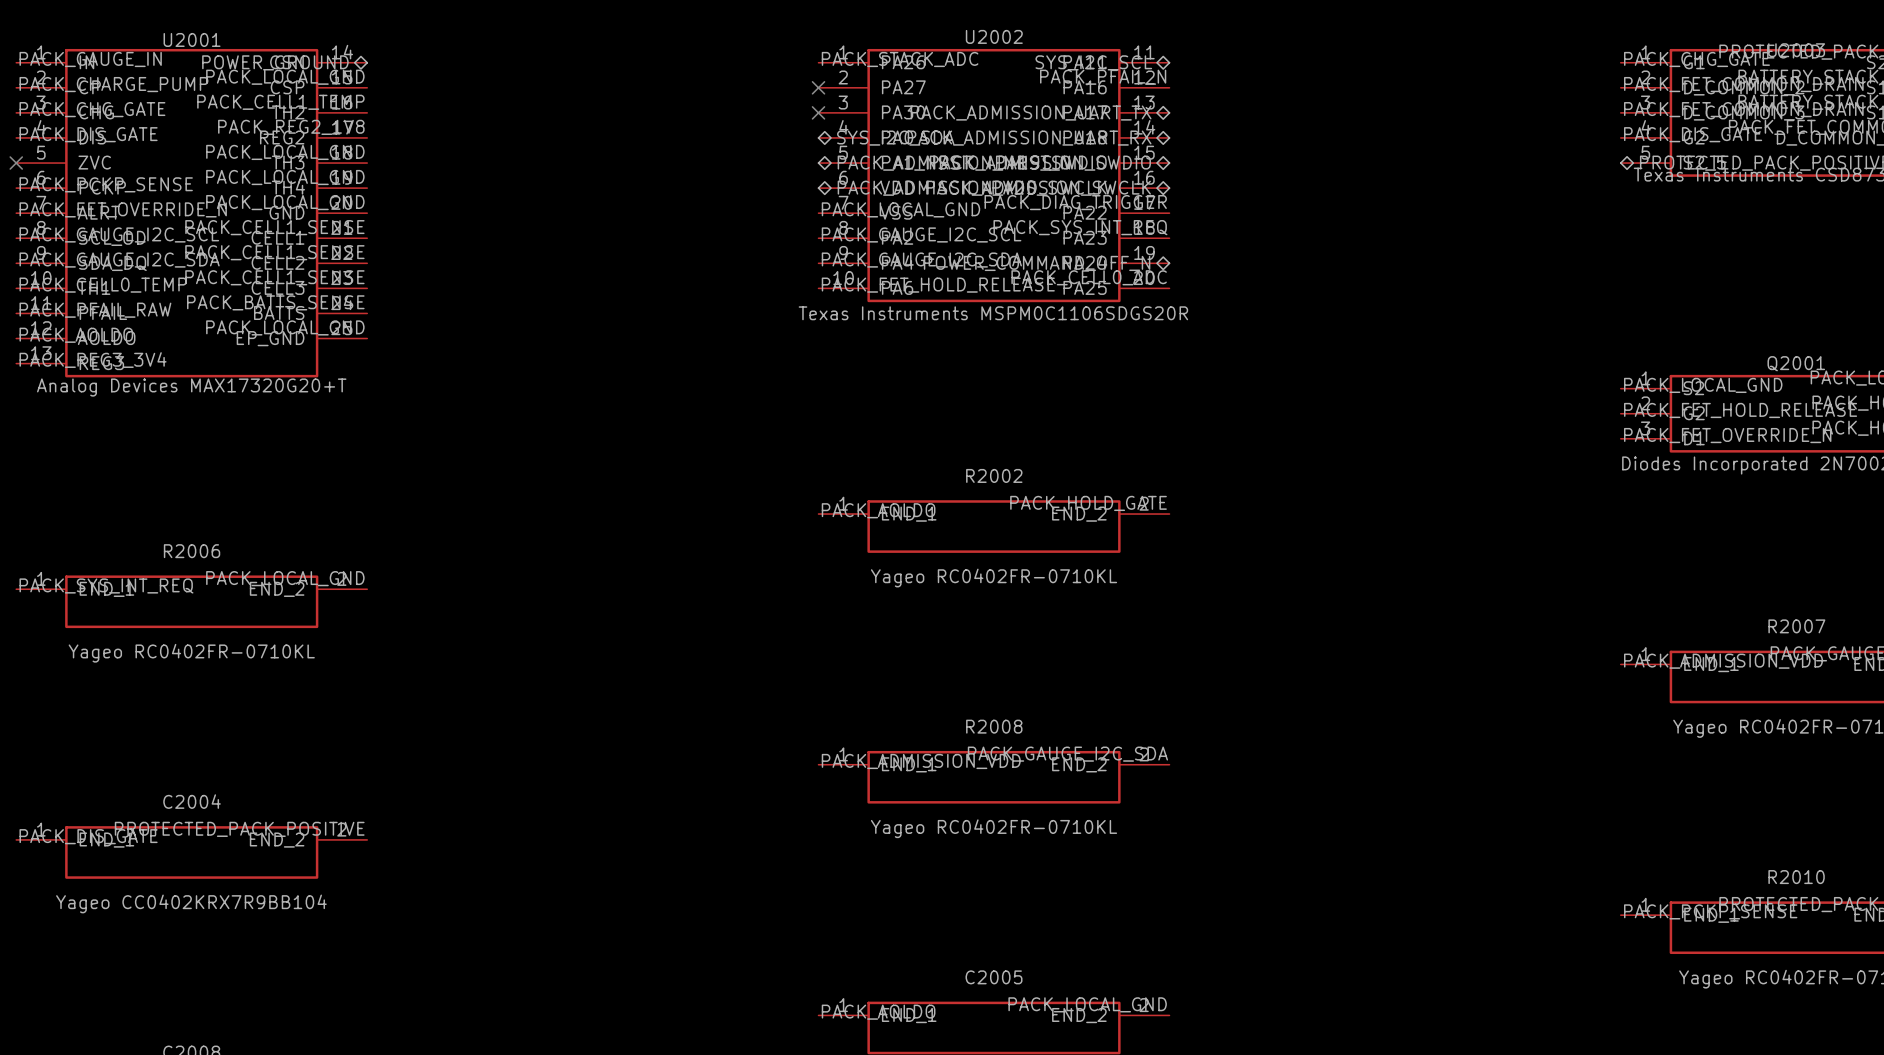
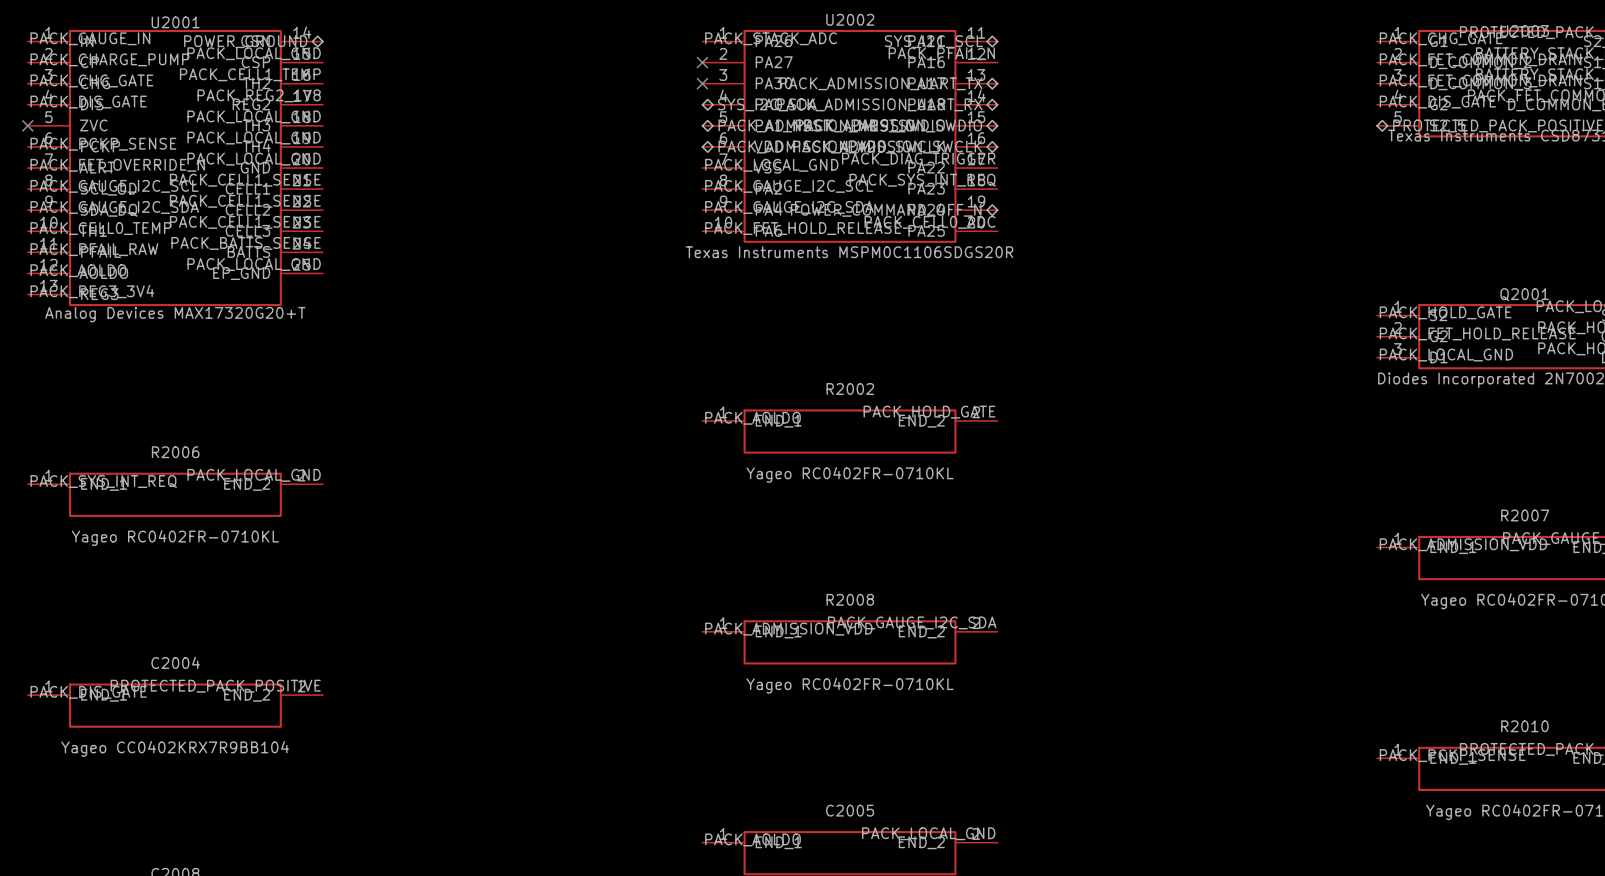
label: PACK_LOCAL_GND (1703, 385) -> PACK_HOLD_GATE (1445, 312)
label: PACK_FET_OVERRIDE_N (1727, 435) -> PACK_LOCAL_GND (1446, 355)

